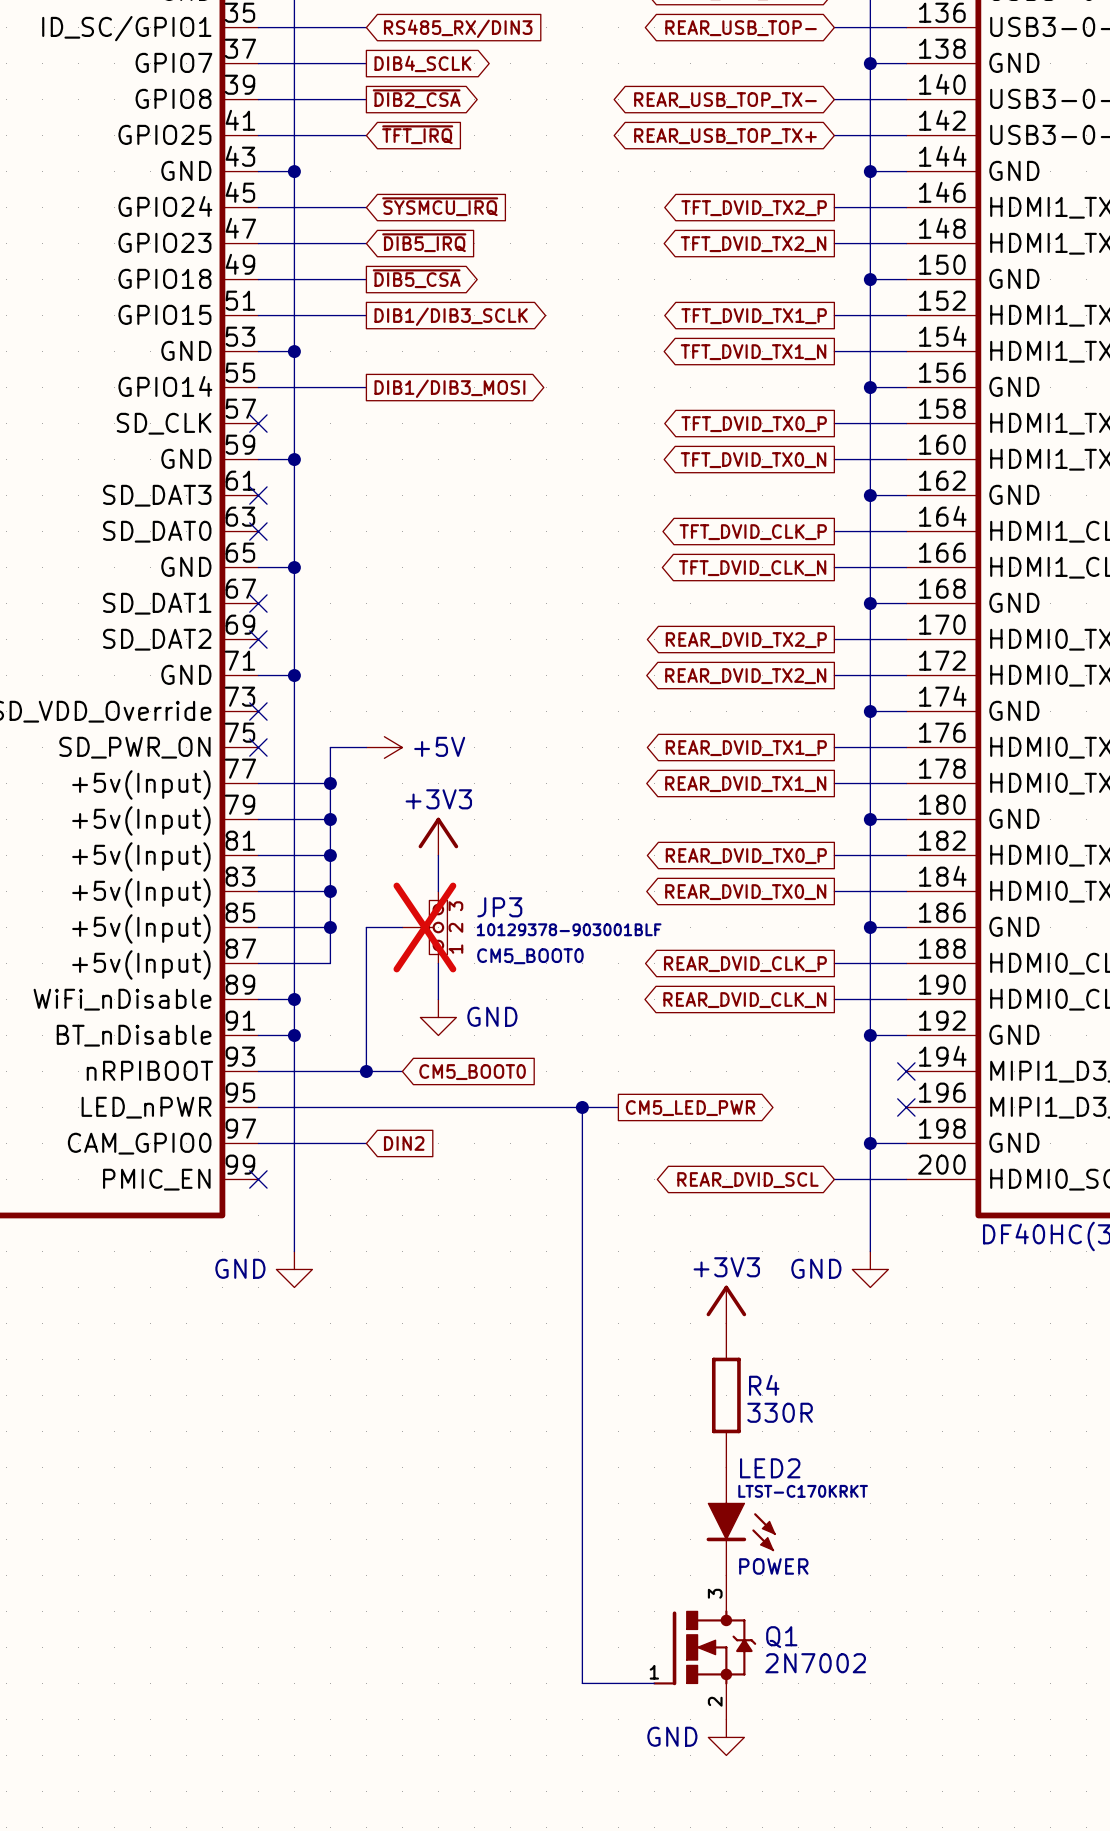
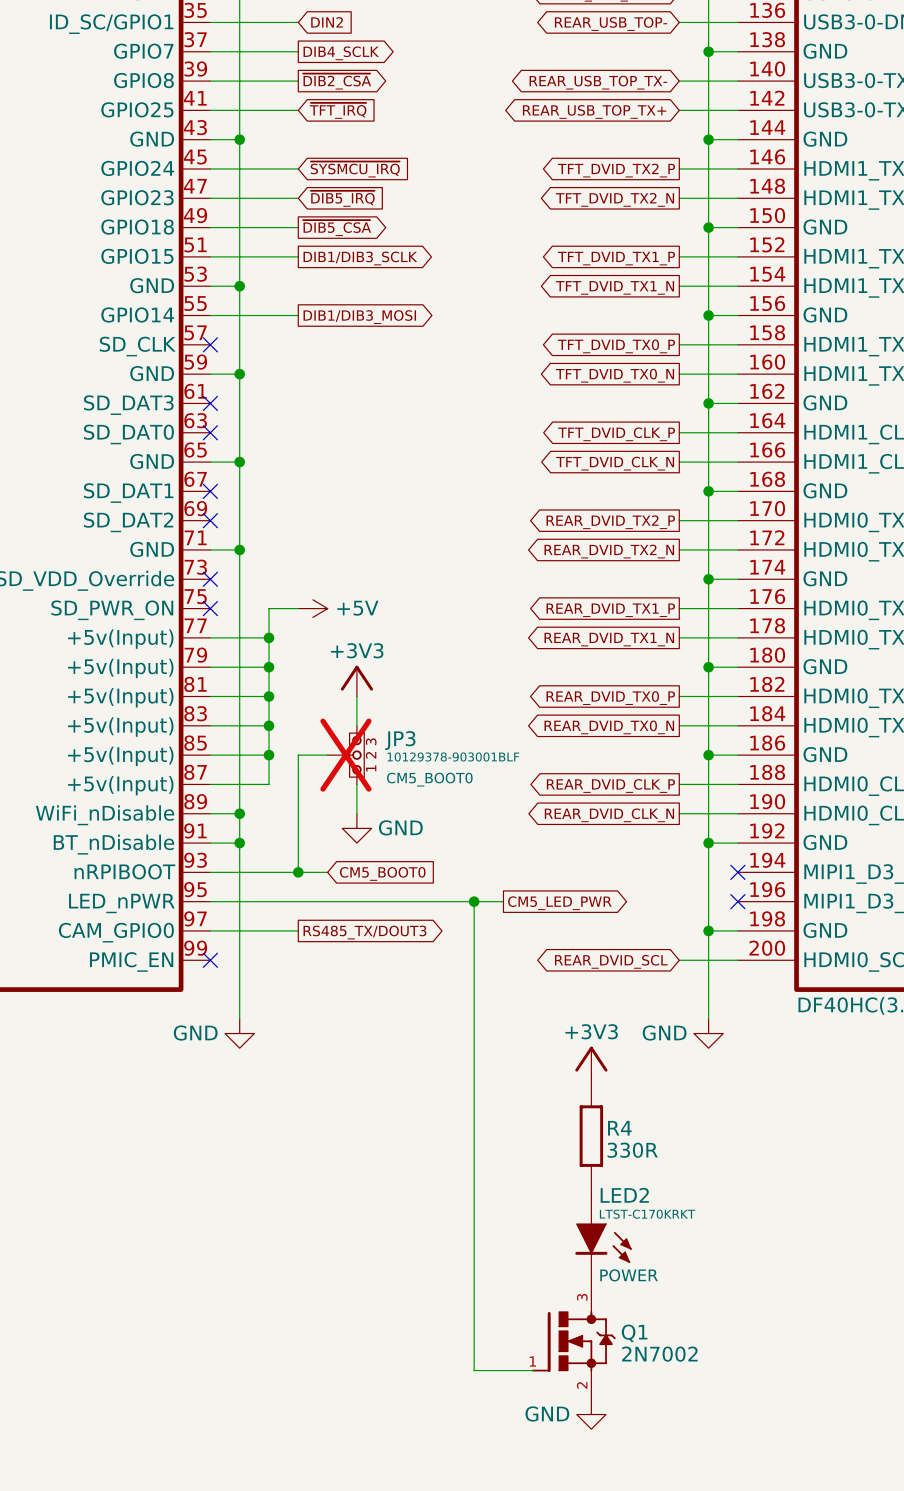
global label: RS485_RX/DIN3 (458, 28) -> DIN2 (327, 22)
global label shape: input (404, 1143) -> output (364, 932)
global label: DIN2 (404, 1143) -> RS485_TX/DOUT3 (364, 932)

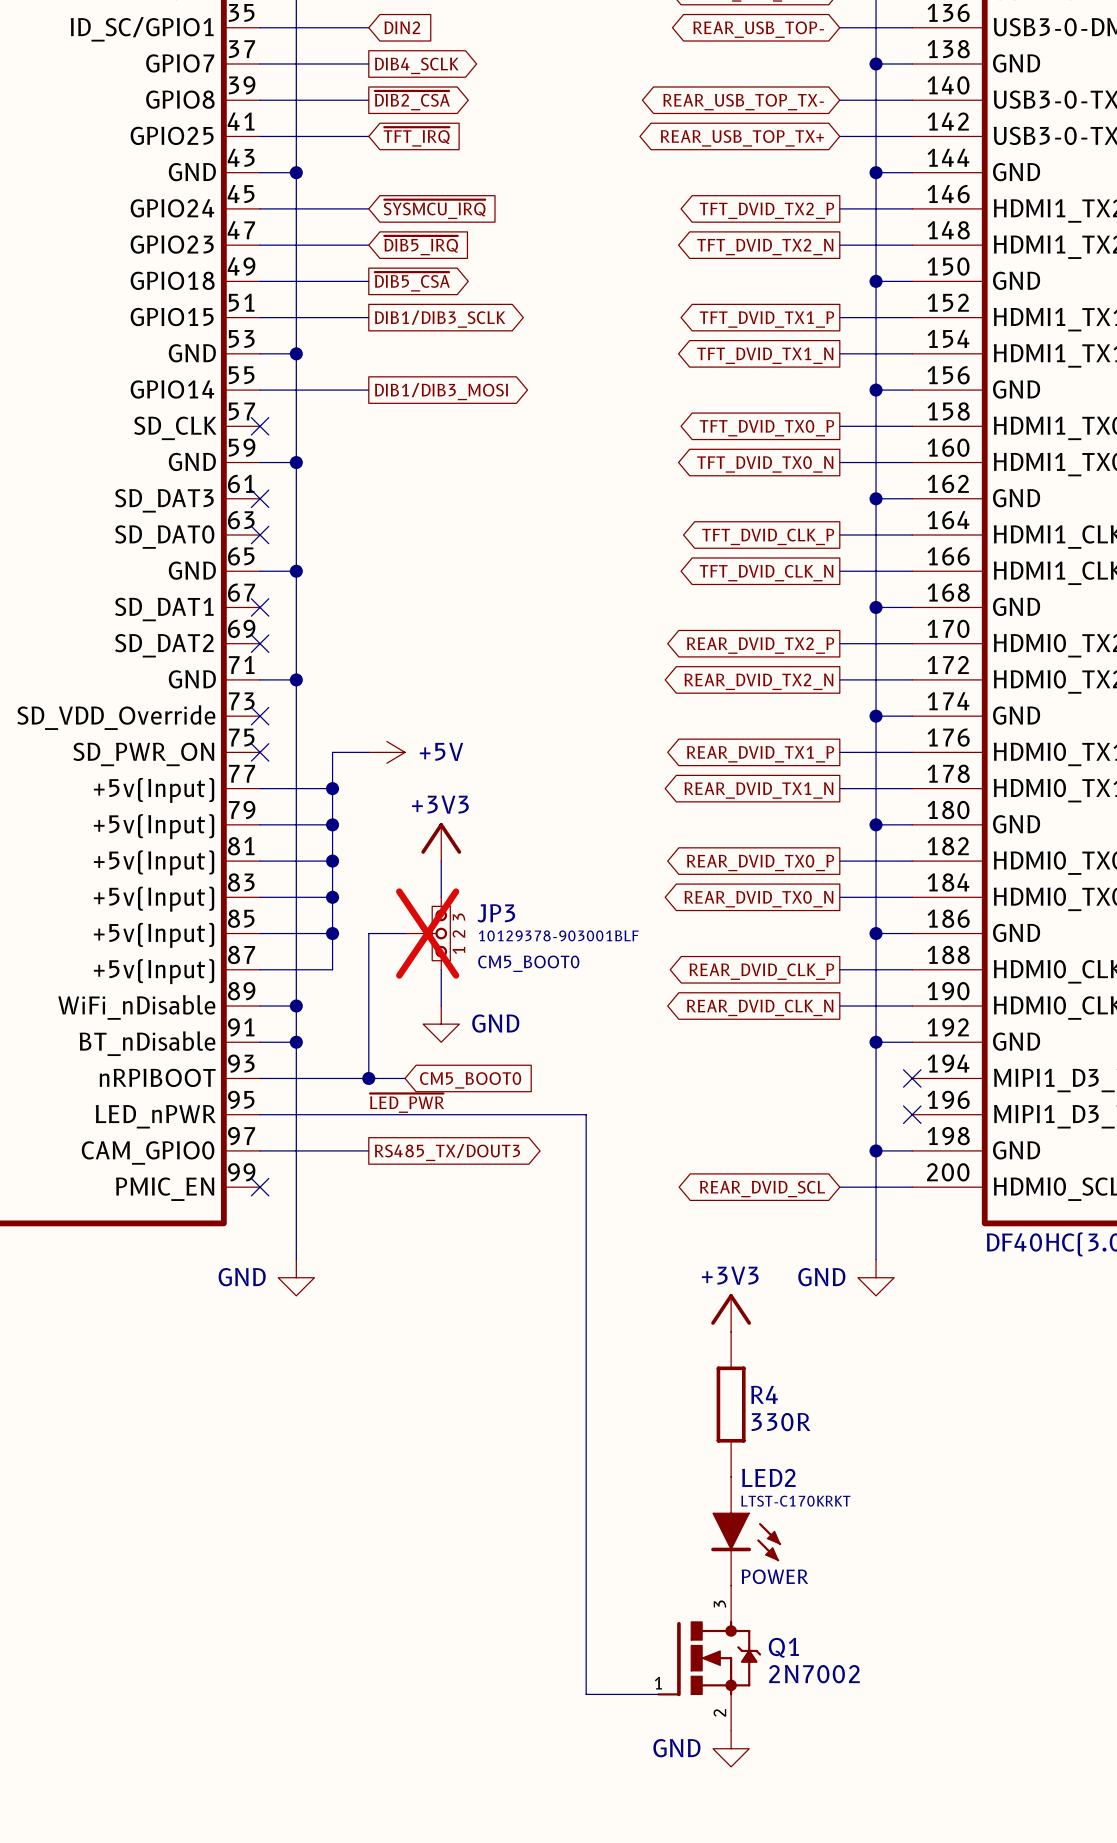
label: none -> ~{LED_PWR} (407, 1103)
wire: (474, 901) (503, 901) -> none
junction: (474, 901) -> none
global label: CM5_LED_PWR (559, 903) -> none

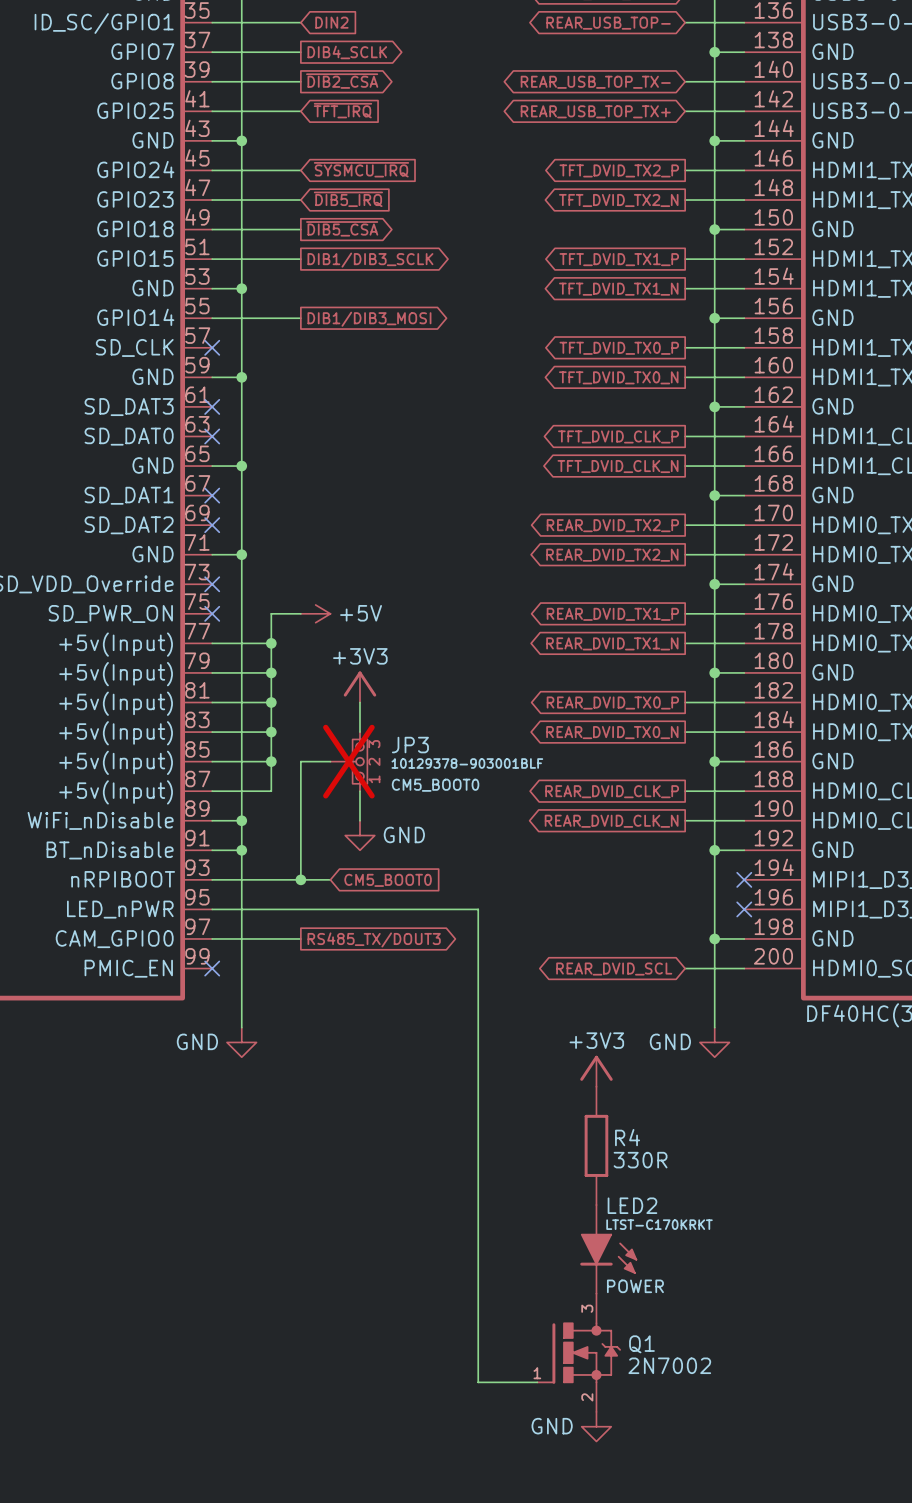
label: ~{LED_PWR} (407, 1103) -> none

